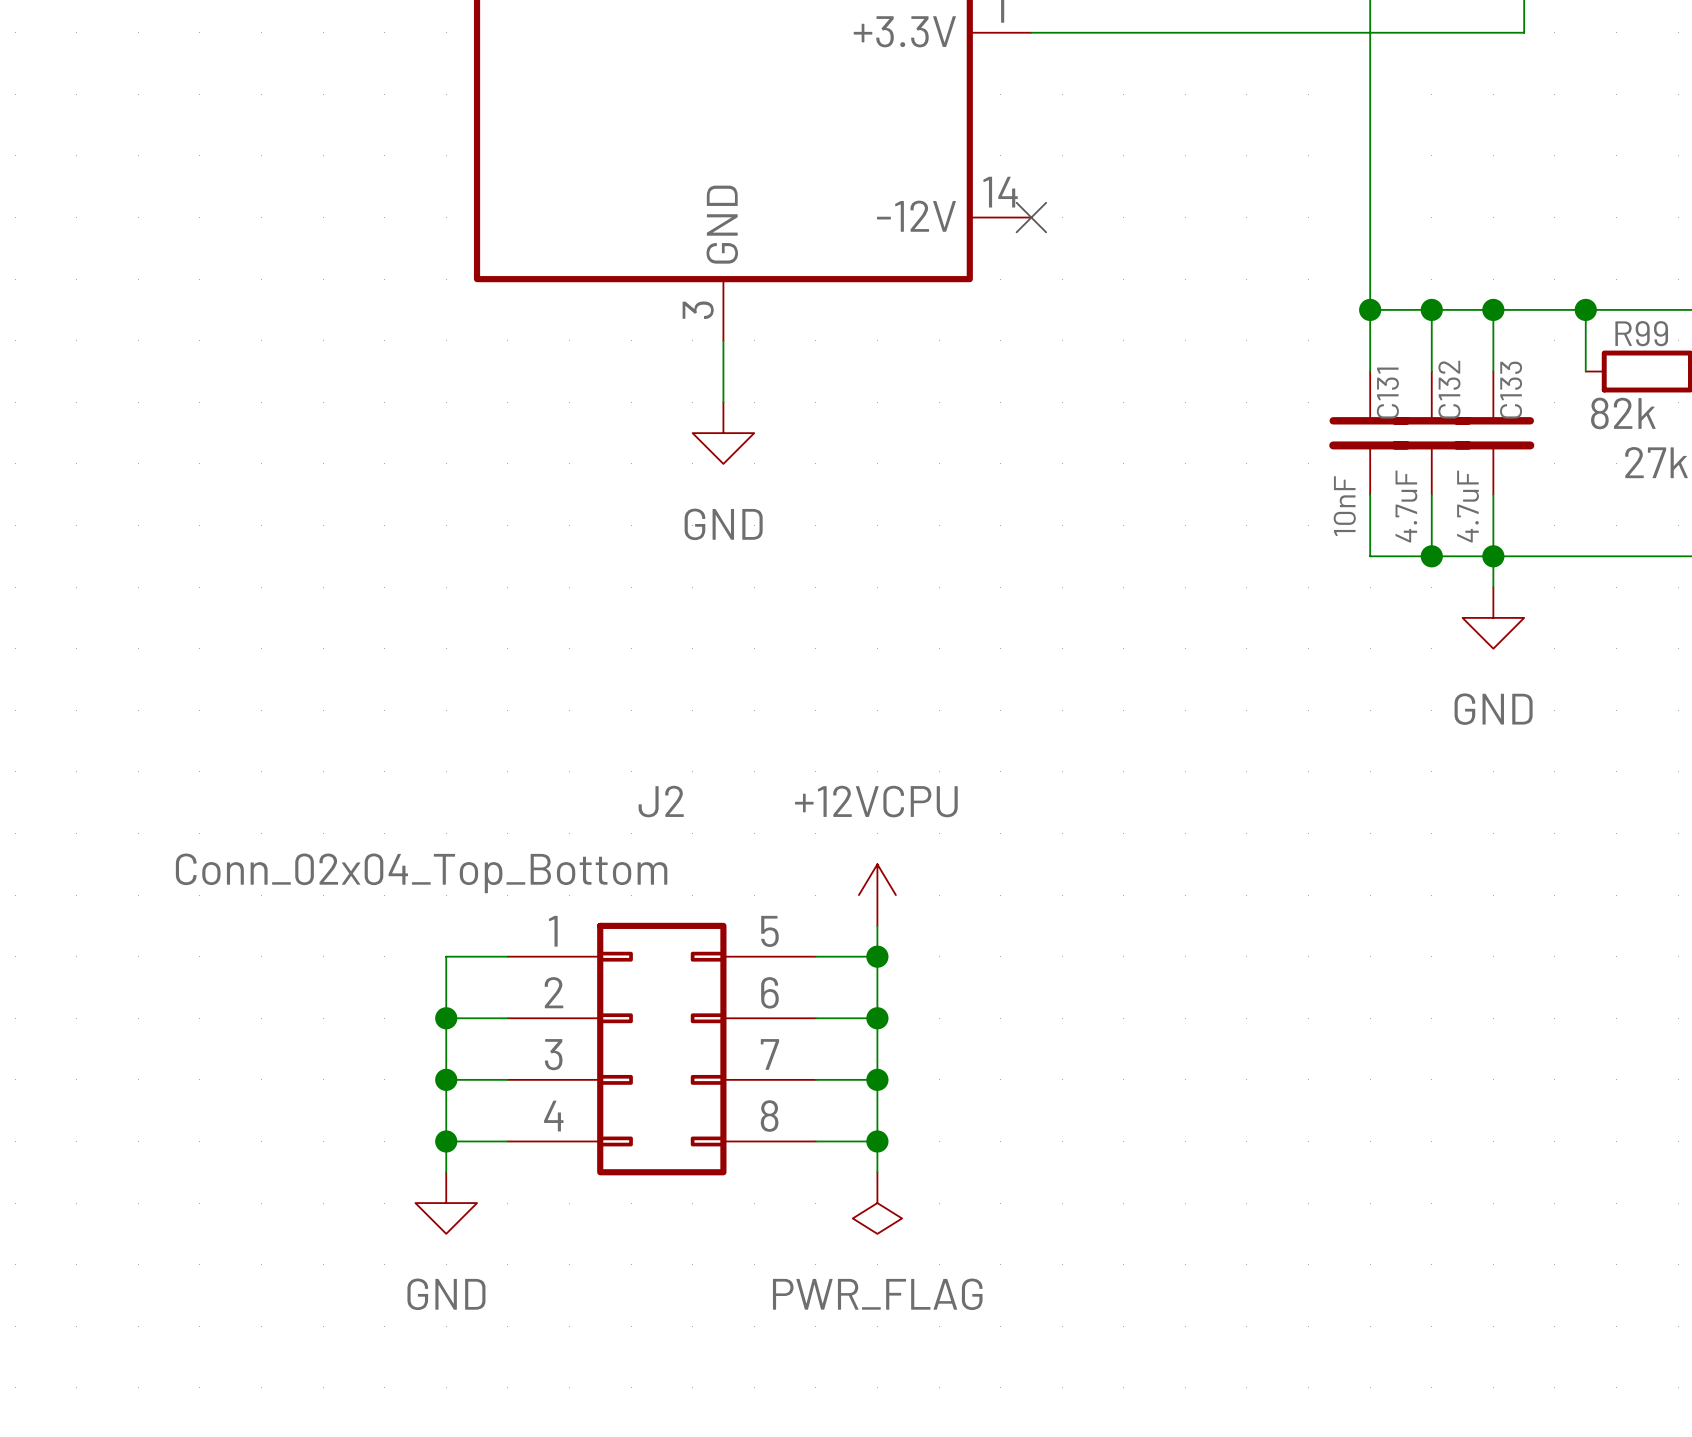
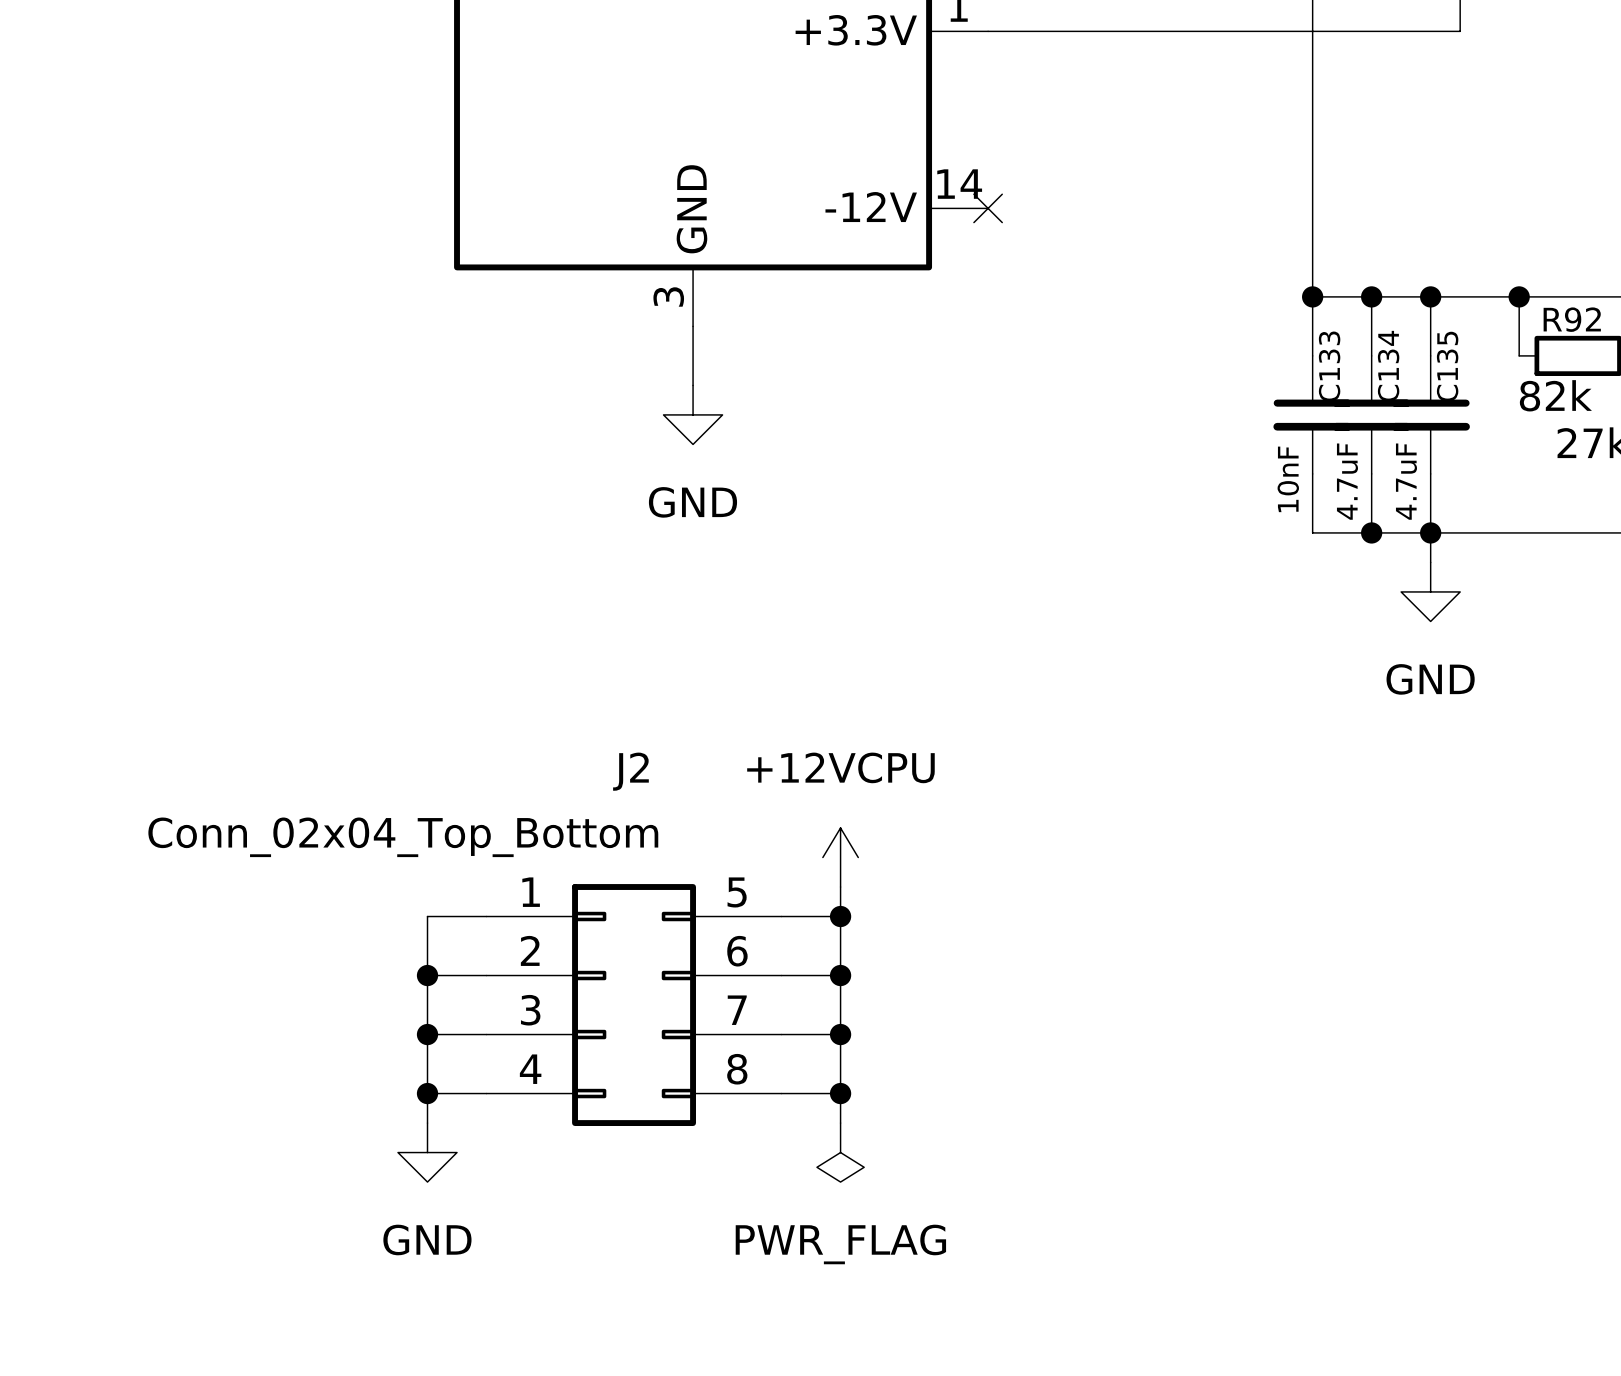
R99 name: R99 (1641, 333) -> R92 (1572, 319)
C132 name: C132 (1449, 389) -> C134 (1388, 366)
C133 name: C133 (1511, 390) -> C135 (1447, 366)
C131 name: C131 (1387, 393) -> C133 (1329, 366)

